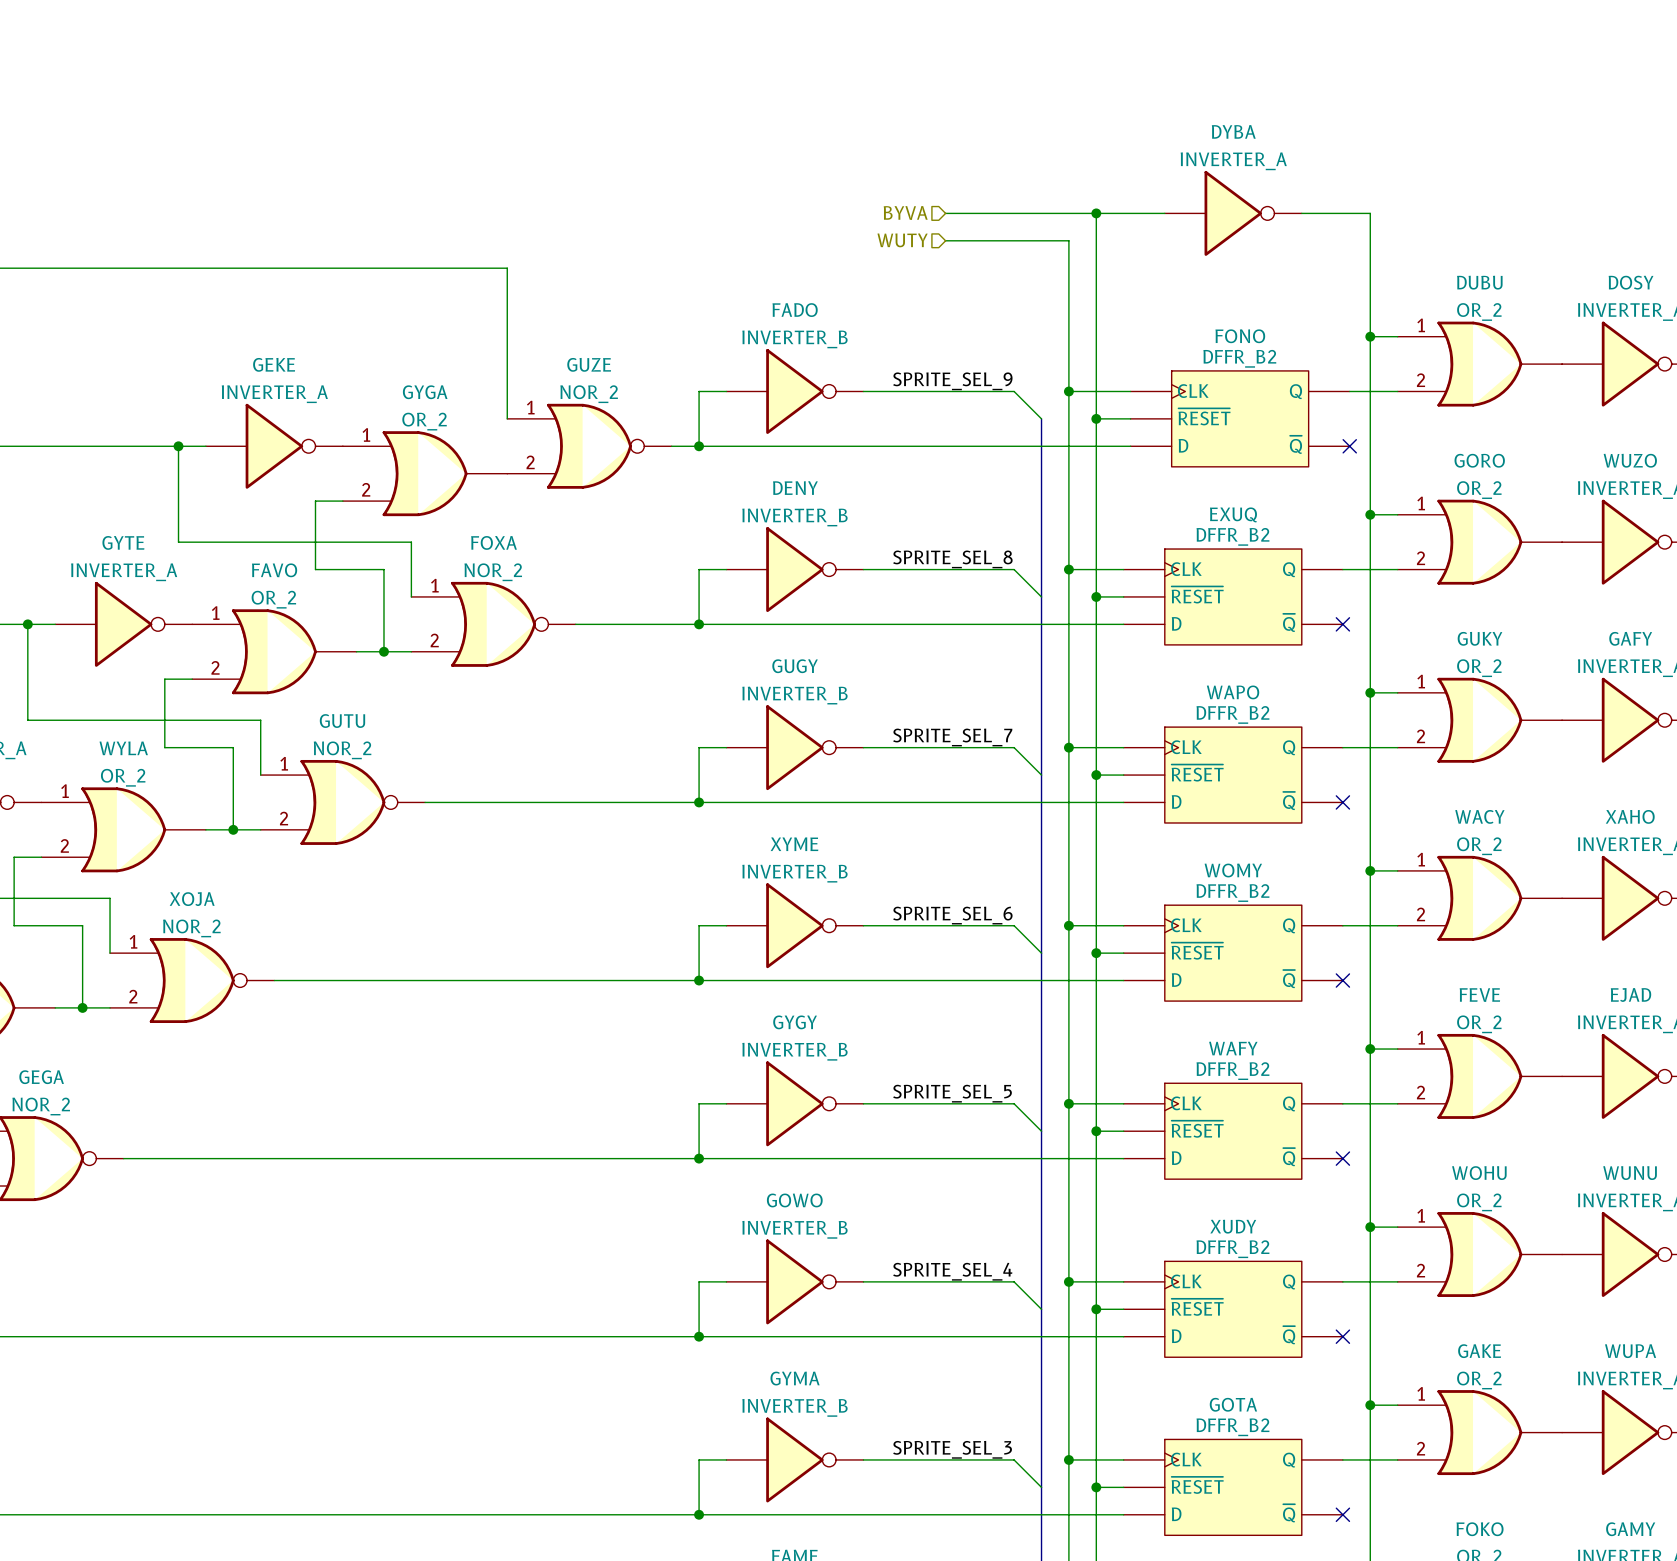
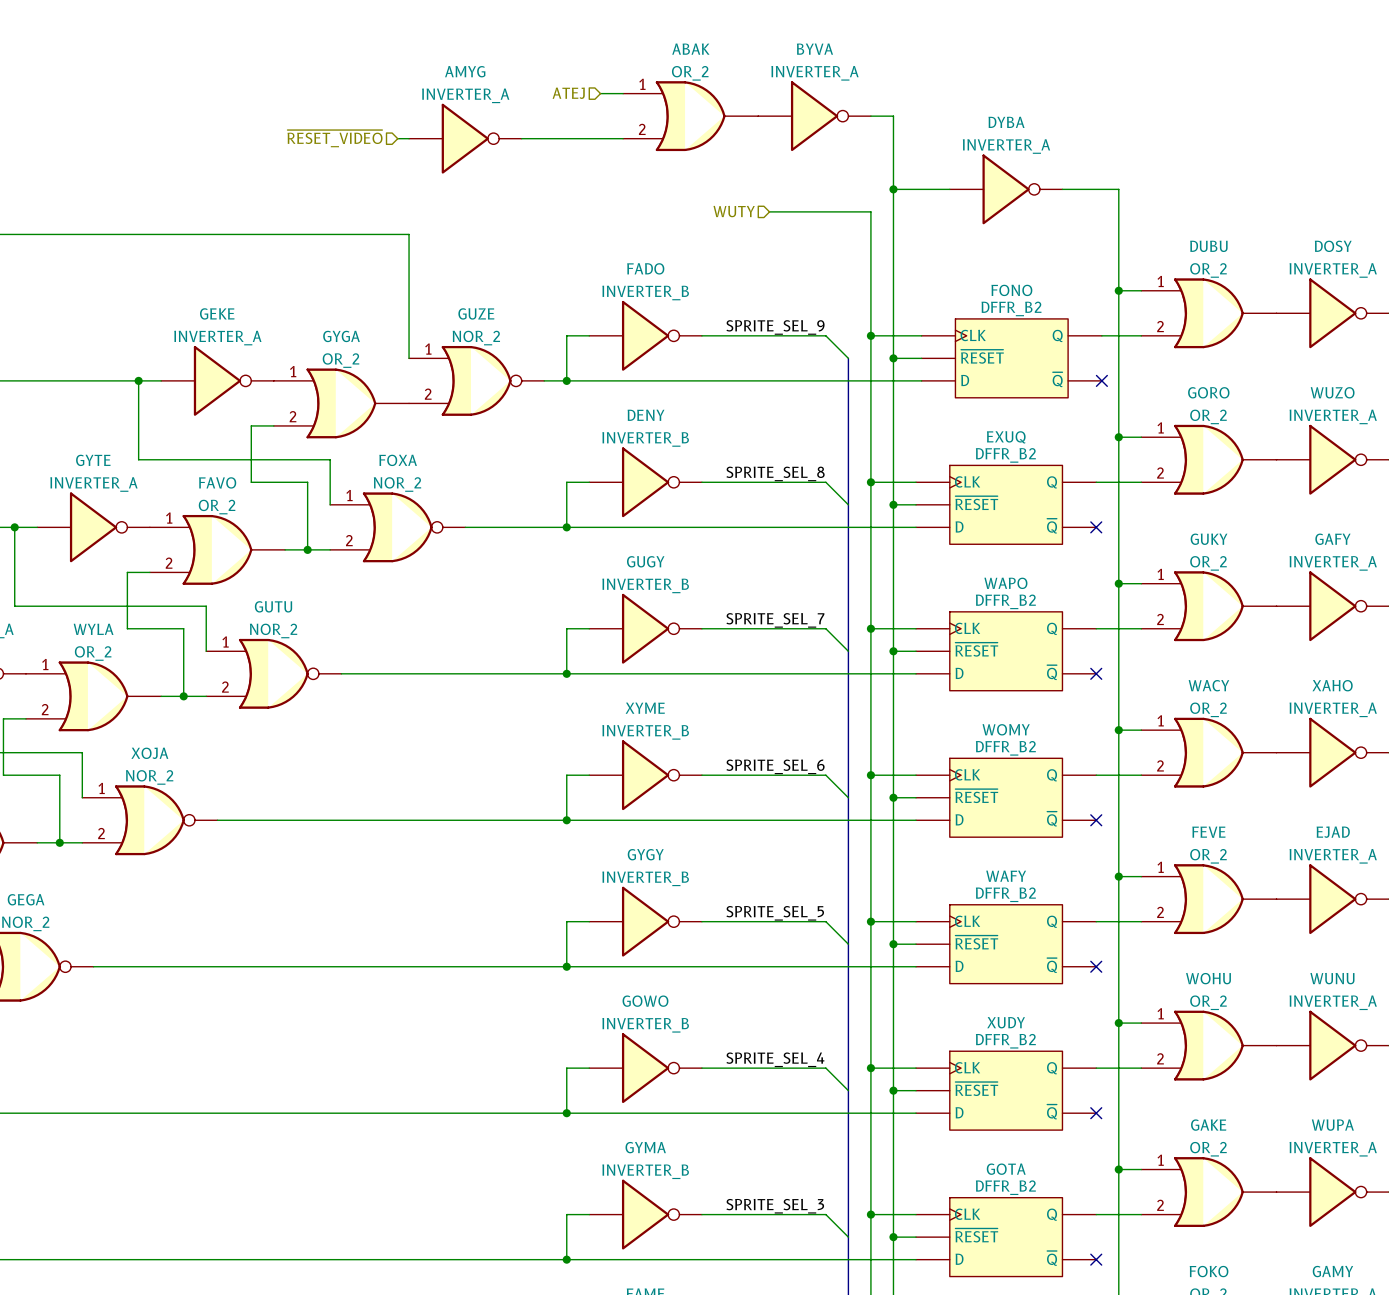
hierarchical label: none -> ATEJ (568, 93)
wire: none -> (600, 93) (623, 93)
ABAK: none -> OR_2 (690, 116)
BYVA: none -> INVERTER_A (814, 116)
hierarchical label: none -> ~{RESET_VIDEO} (335, 138)
wire: none -> (397, 138) (409, 138)
AMYG: none -> INVERTER_A (465, 138)
wire: none -> (521, 138) (623, 138)
hierarchical label: BYVA (905, 212) -> none
wire: (945, 213) (1096, 213) -> (870, 116) (893, 116) (893, 189)

